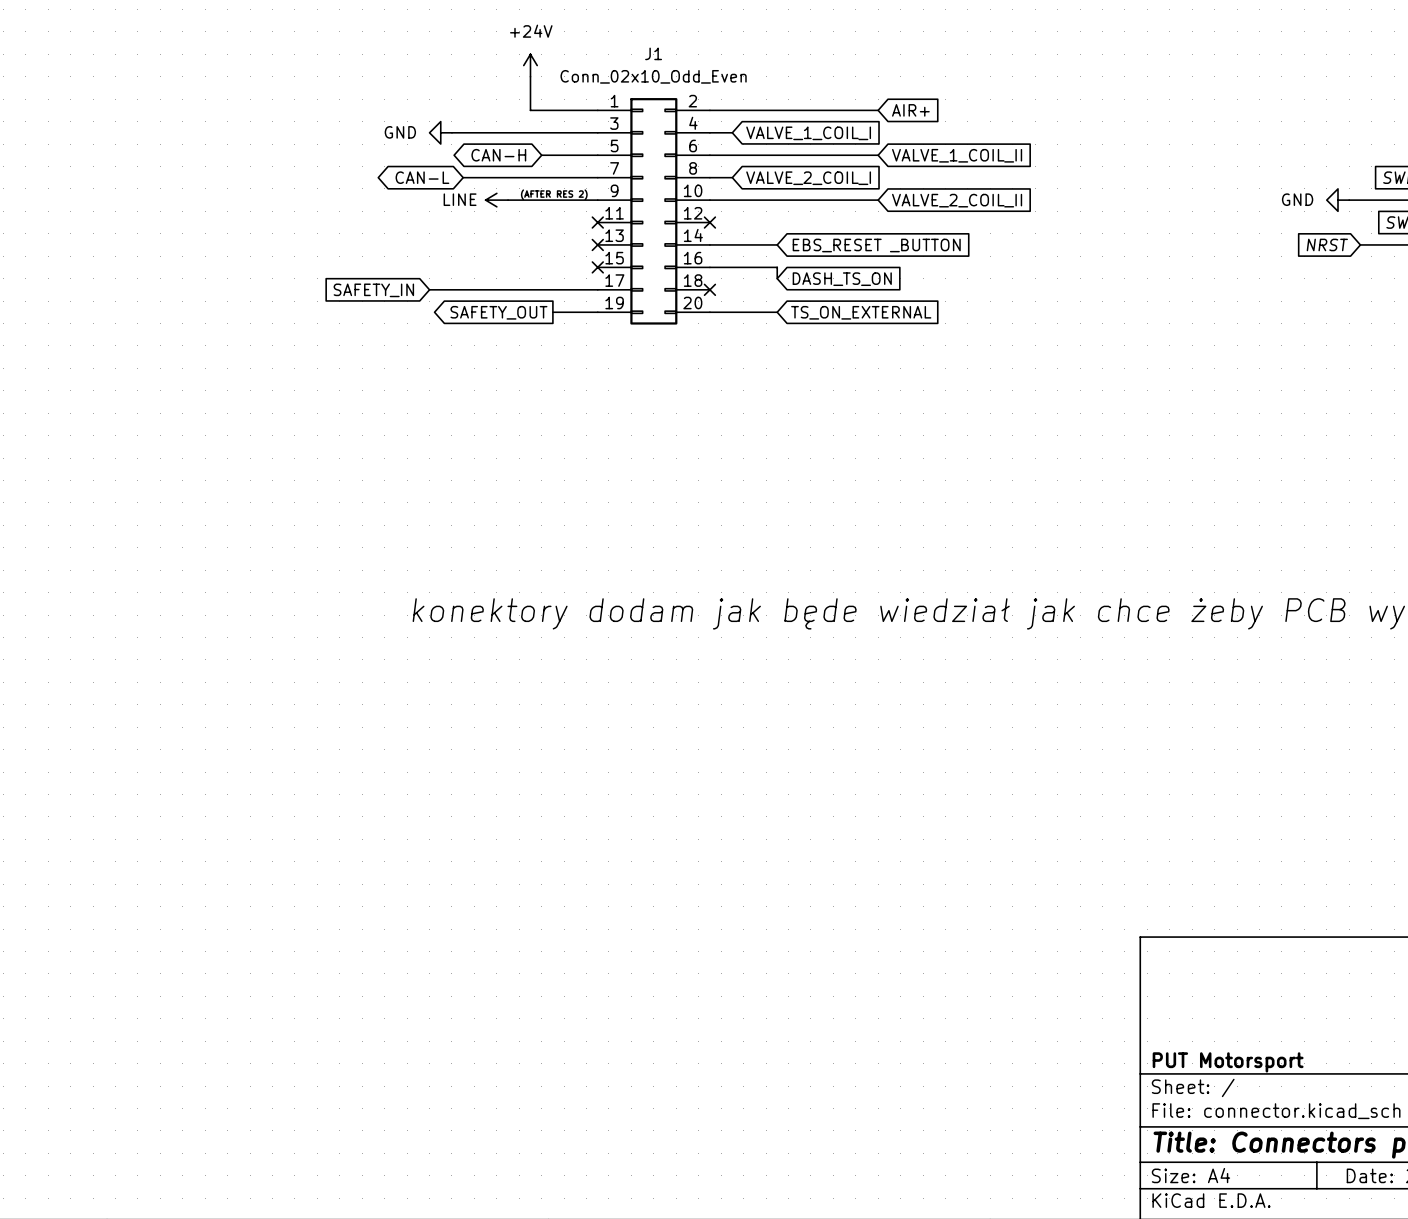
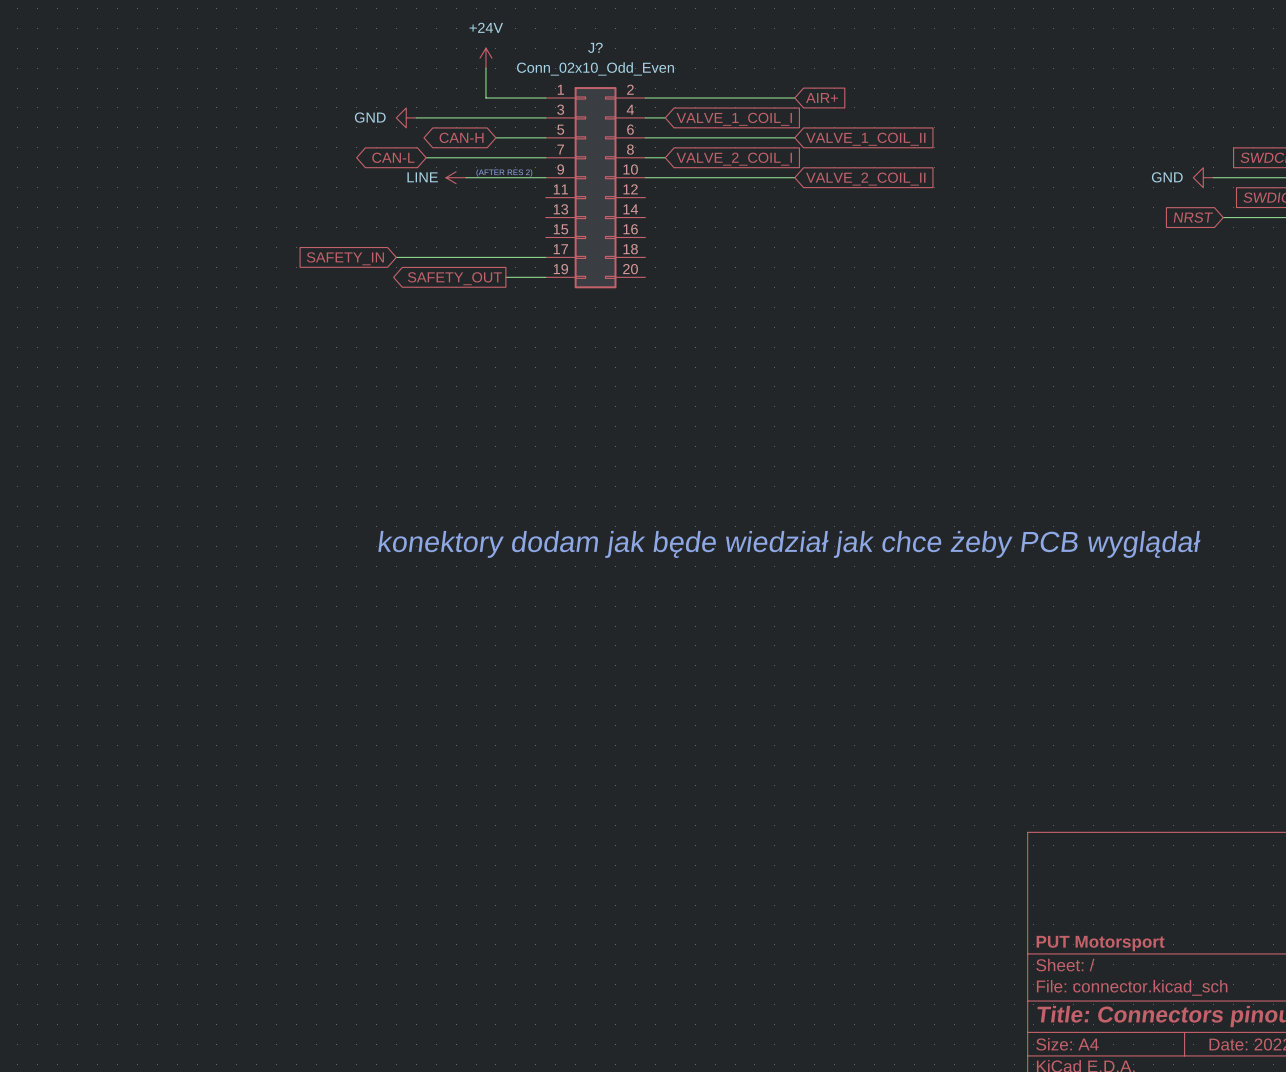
J1 name: J1 (653, 53) -> J? (595, 47)
no-connect mark: (597, 222) -> none
no-connect mark: (709, 222) -> none
no-connect mark: (597, 244) -> none
wire: (709, 244) (777, 244) -> none
global label: EBS_RESET _BUTTON (876, 245) -> none
no-connect mark: (597, 267) -> none
wire: (709, 267) (777, 267) (777, 278) -> none
global label: DASH_TS_ON (842, 279) -> none
no-connect mark: (709, 289) -> none
wire: (709, 312) (777, 312) -> none
global label: TS_ON_EXTERNAL (861, 312) -> none

